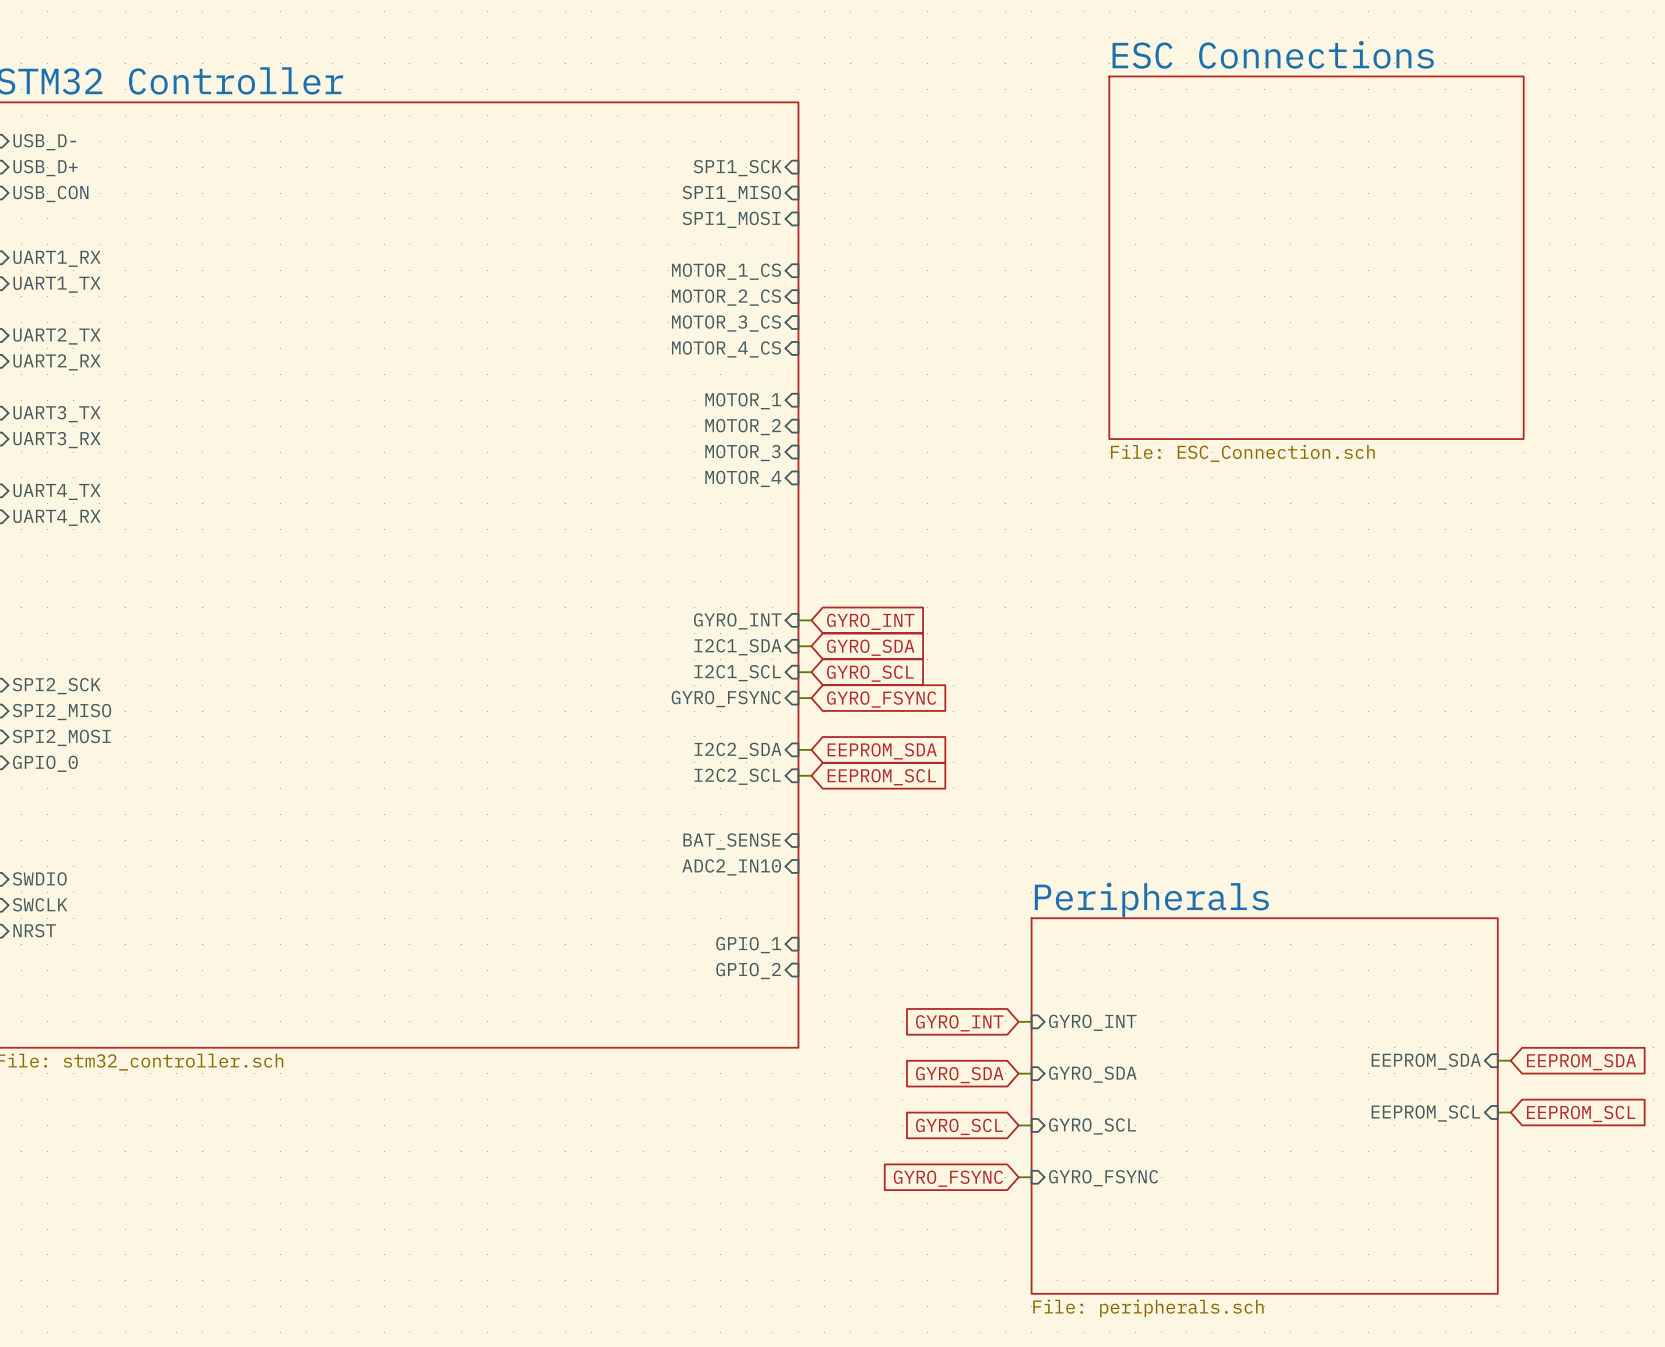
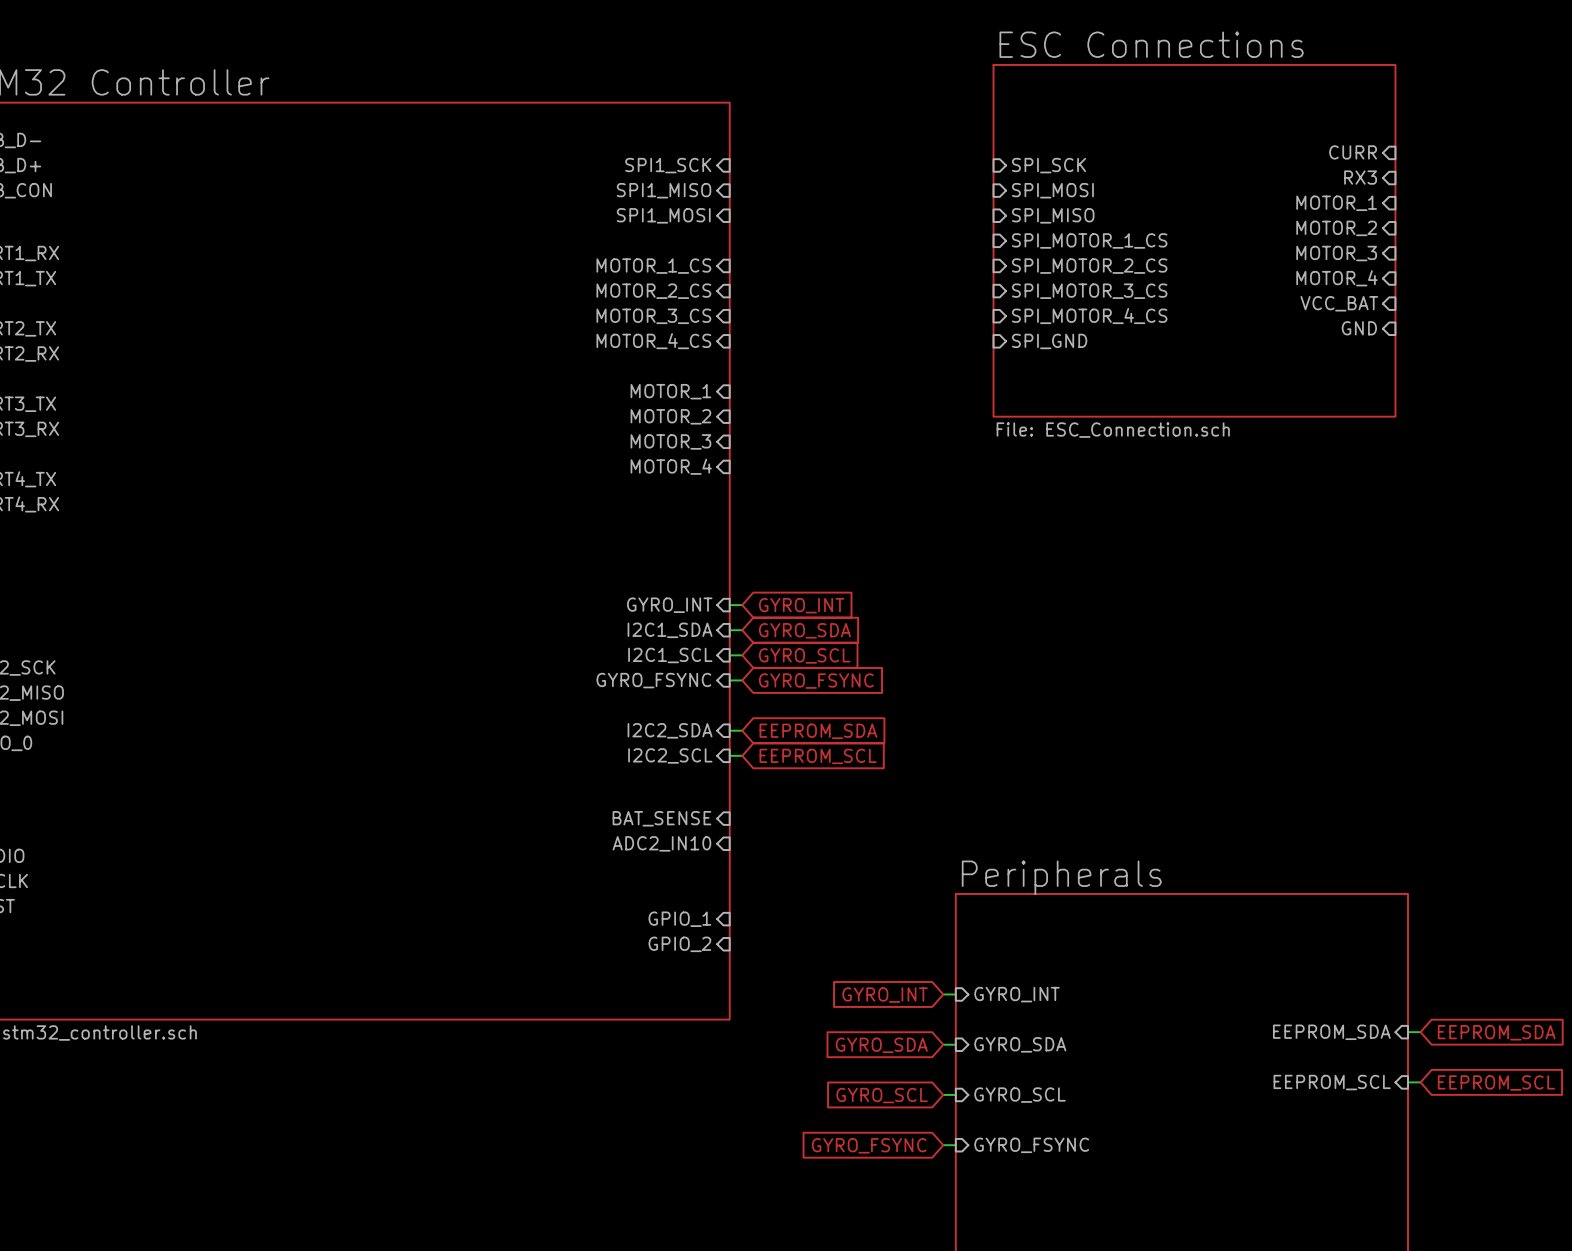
sheet pin: none -> CURR (1353, 152)
sheet pin: none -> SPI_SCK (1049, 165)
sheet pin: none -> RX3 (1360, 177)
sheet pin: none -> SPI_MOSI (1052, 190)
sheet pin: none -> MOTOR_1 (1336, 203)
sheet pin: none -> SPI_MISO (1053, 215)
sheet pin: none -> MOTOR_2 (1336, 228)
sheet pin: none -> SPI_MOTOR_1_CS (1089, 240)
sheet ESC Connections position: (1316, 257) -> (1194, 240)
sheet pin: none -> MOTOR_3 (1336, 253)
sheet pin: none -> SPI_MOTOR_2_CS (1089, 266)
sheet pin: none -> MOTOR_4 (1336, 278)
sheet pin: none -> SPI_MOTOR_3_CS (1089, 291)
sheet pin: none -> VCC_BAT (1339, 303)
sheet pin: none -> SPI_MOTOR_4_CS (1089, 316)
sheet pin: none -> GND (1359, 328)
sheet pin: none -> SPI_GND (1049, 341)

